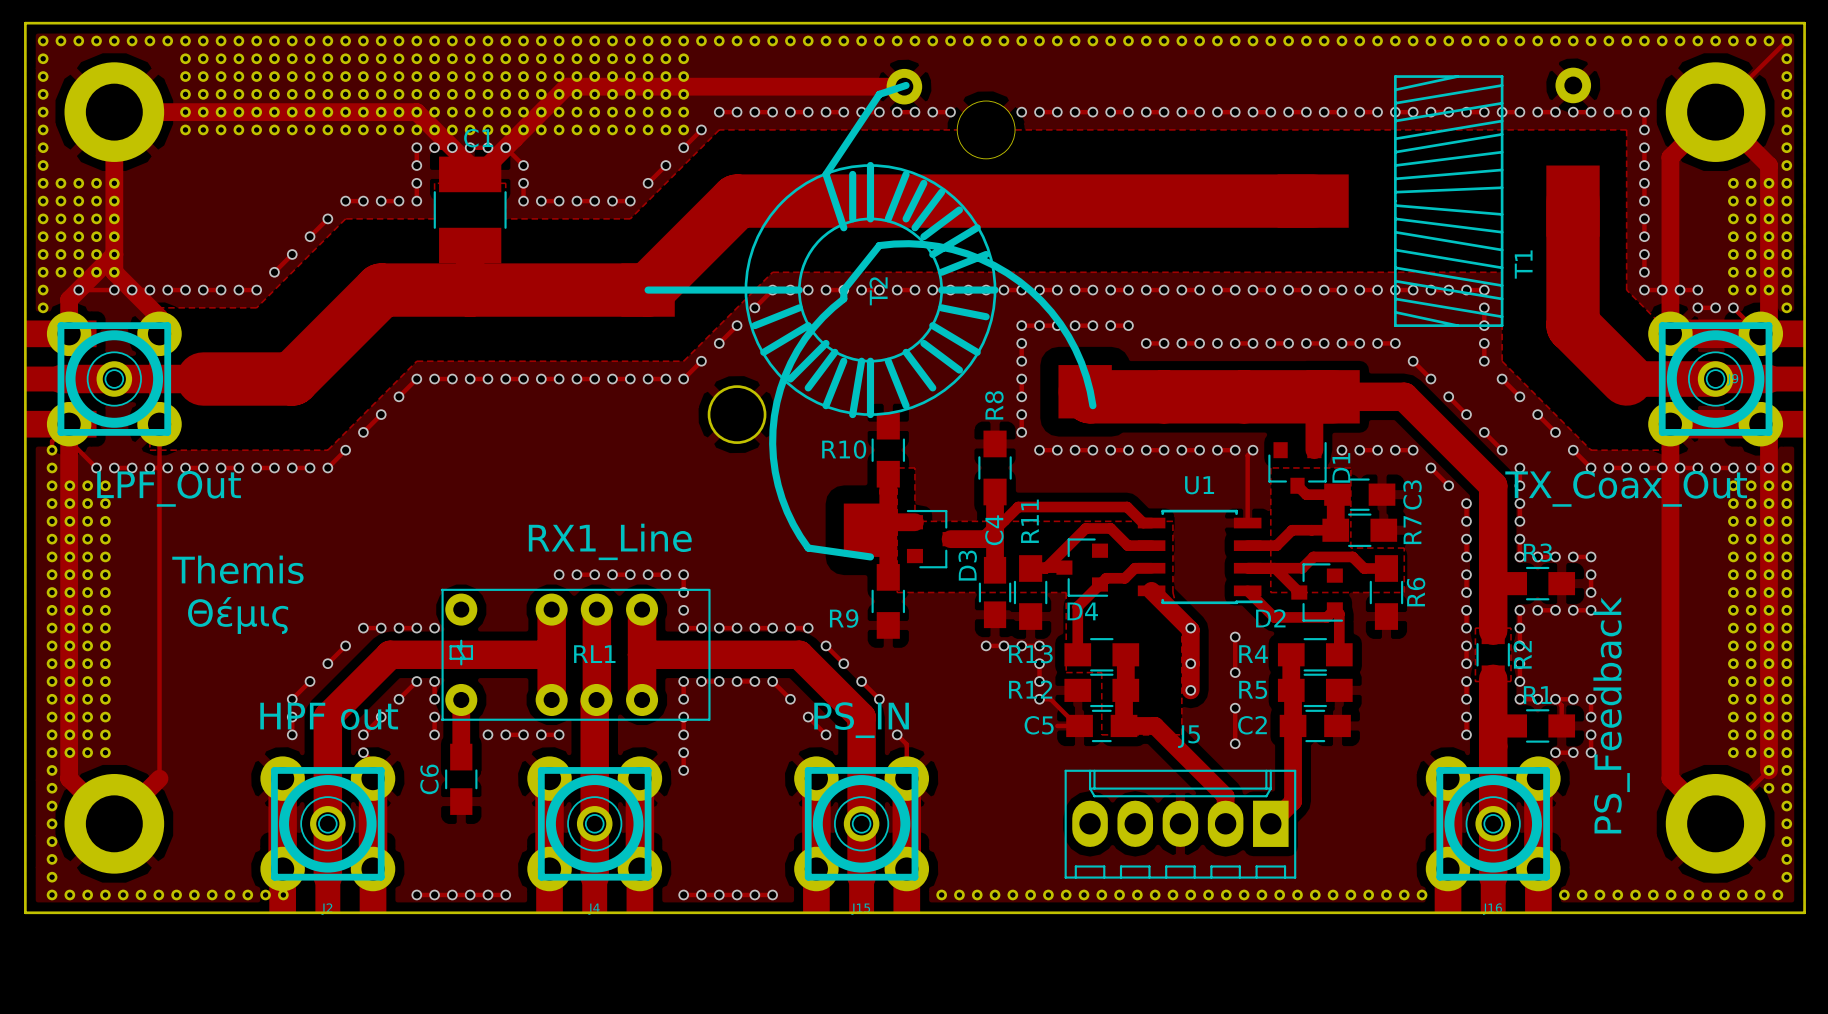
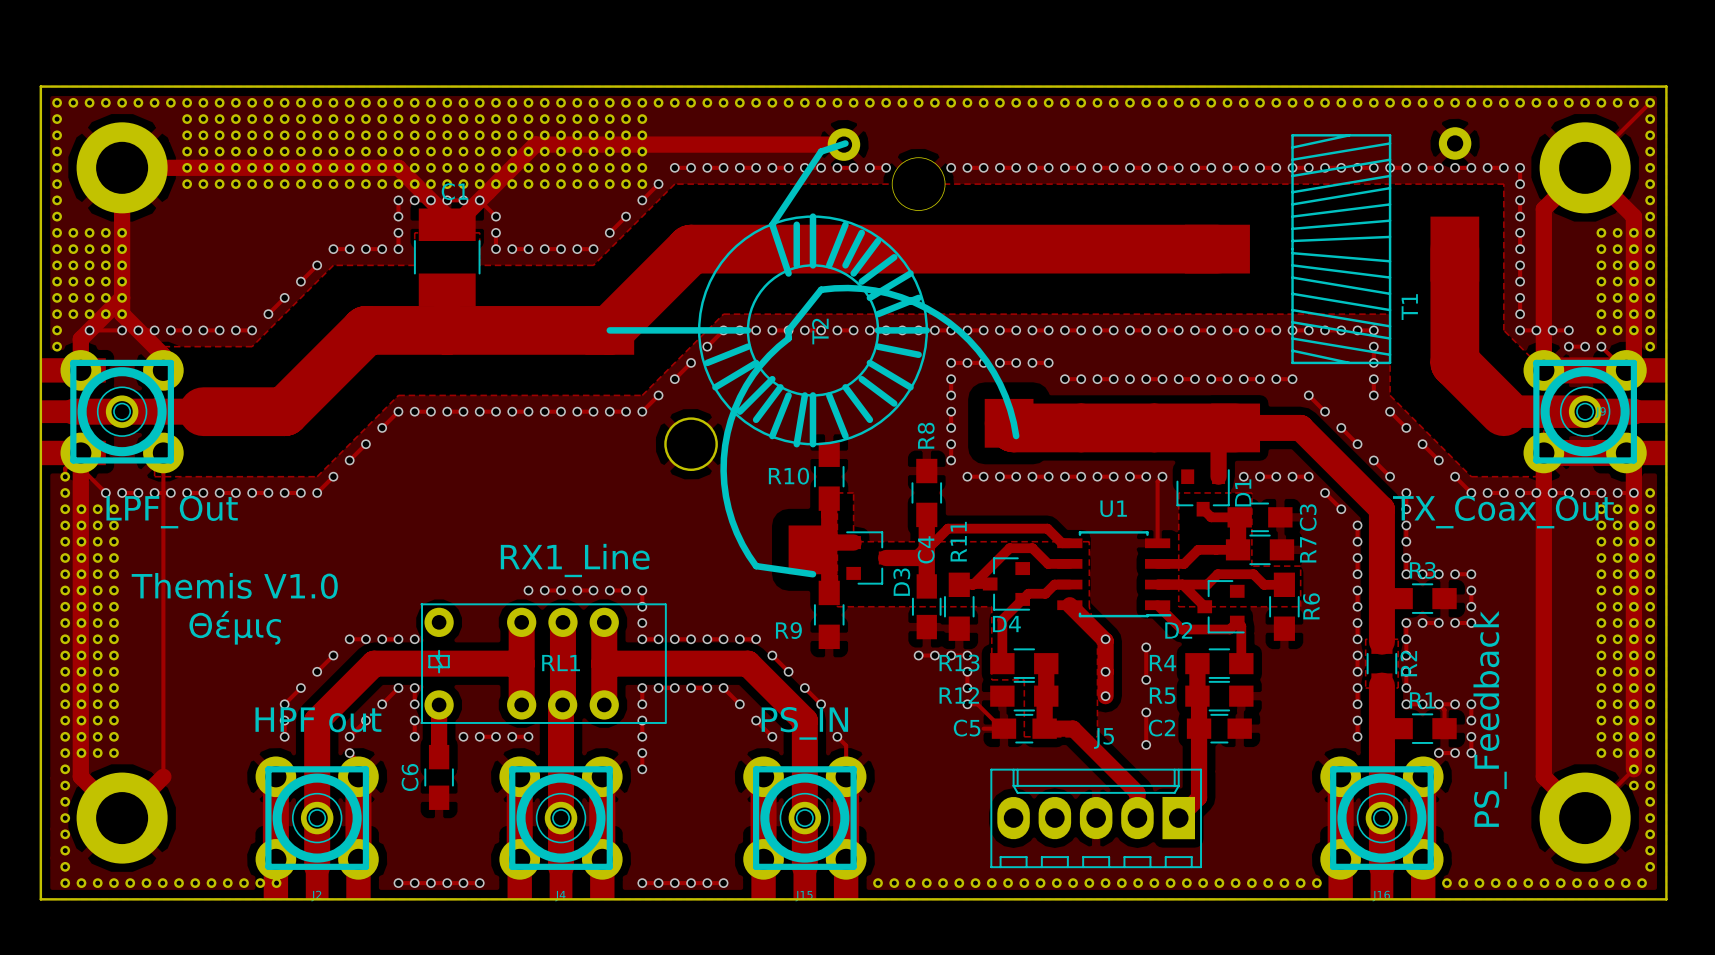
text: Themis (237, 569) -> Themis V1.0 (234, 585)

